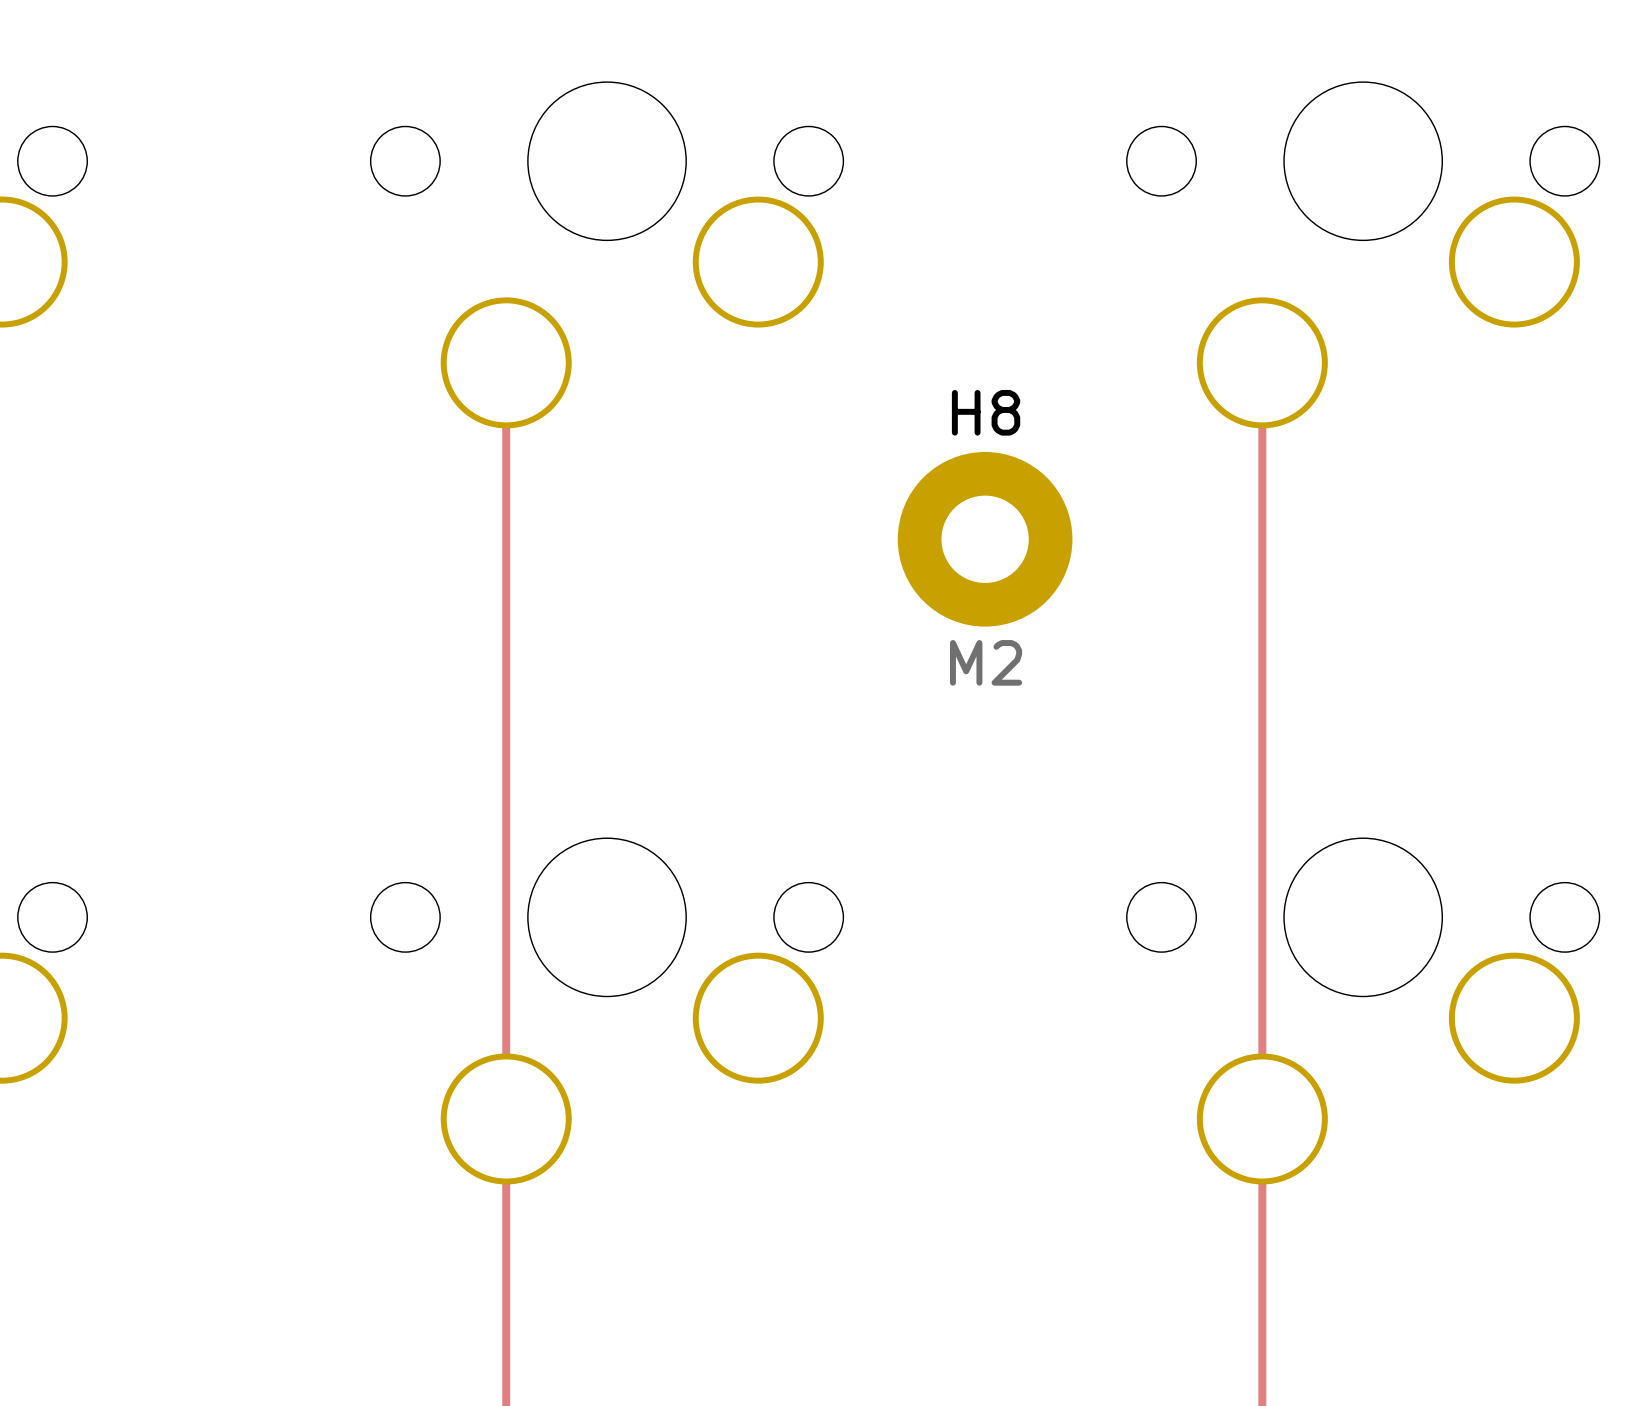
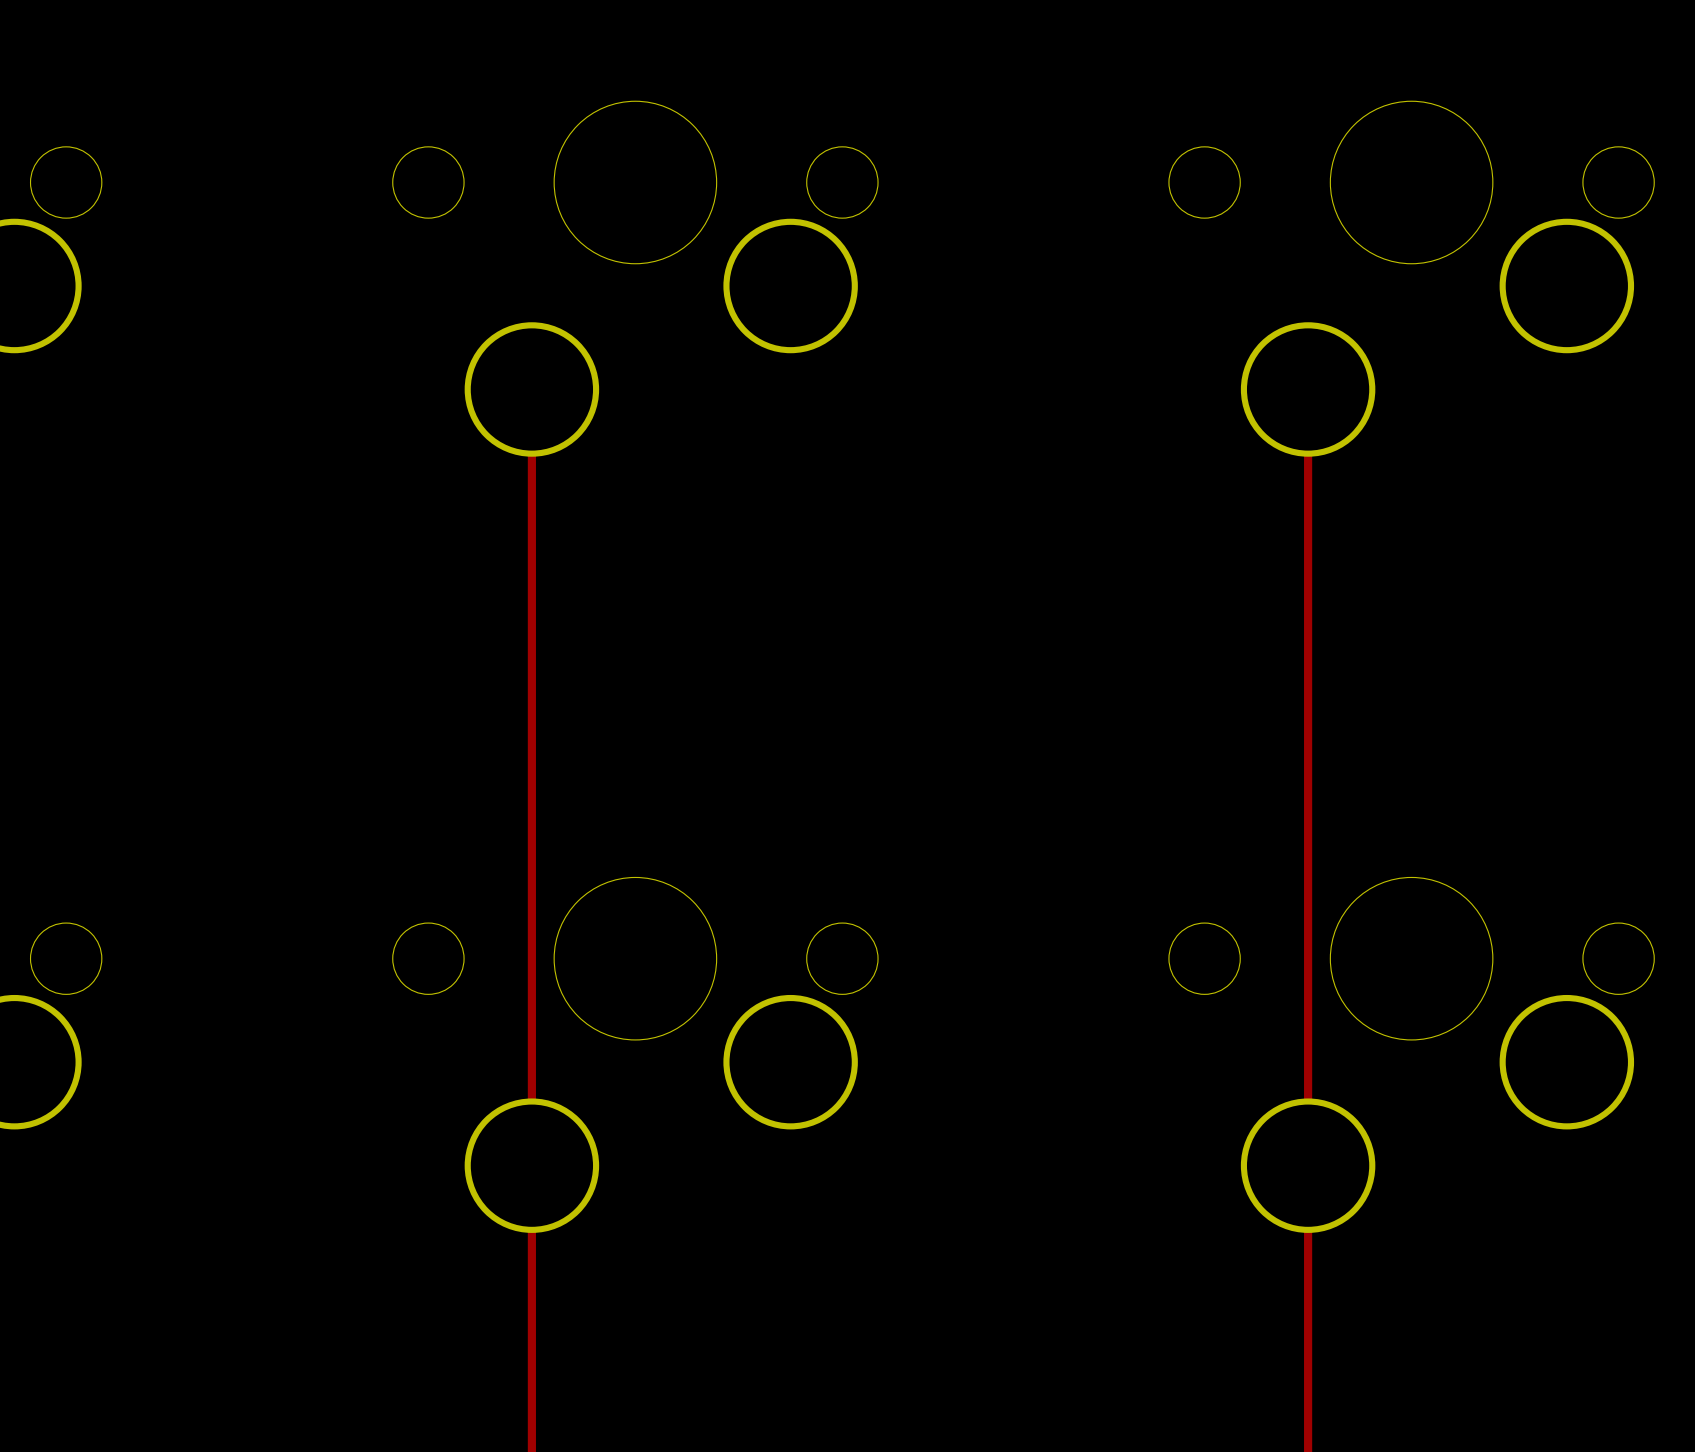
H8: M2 (985, 539) -> none

